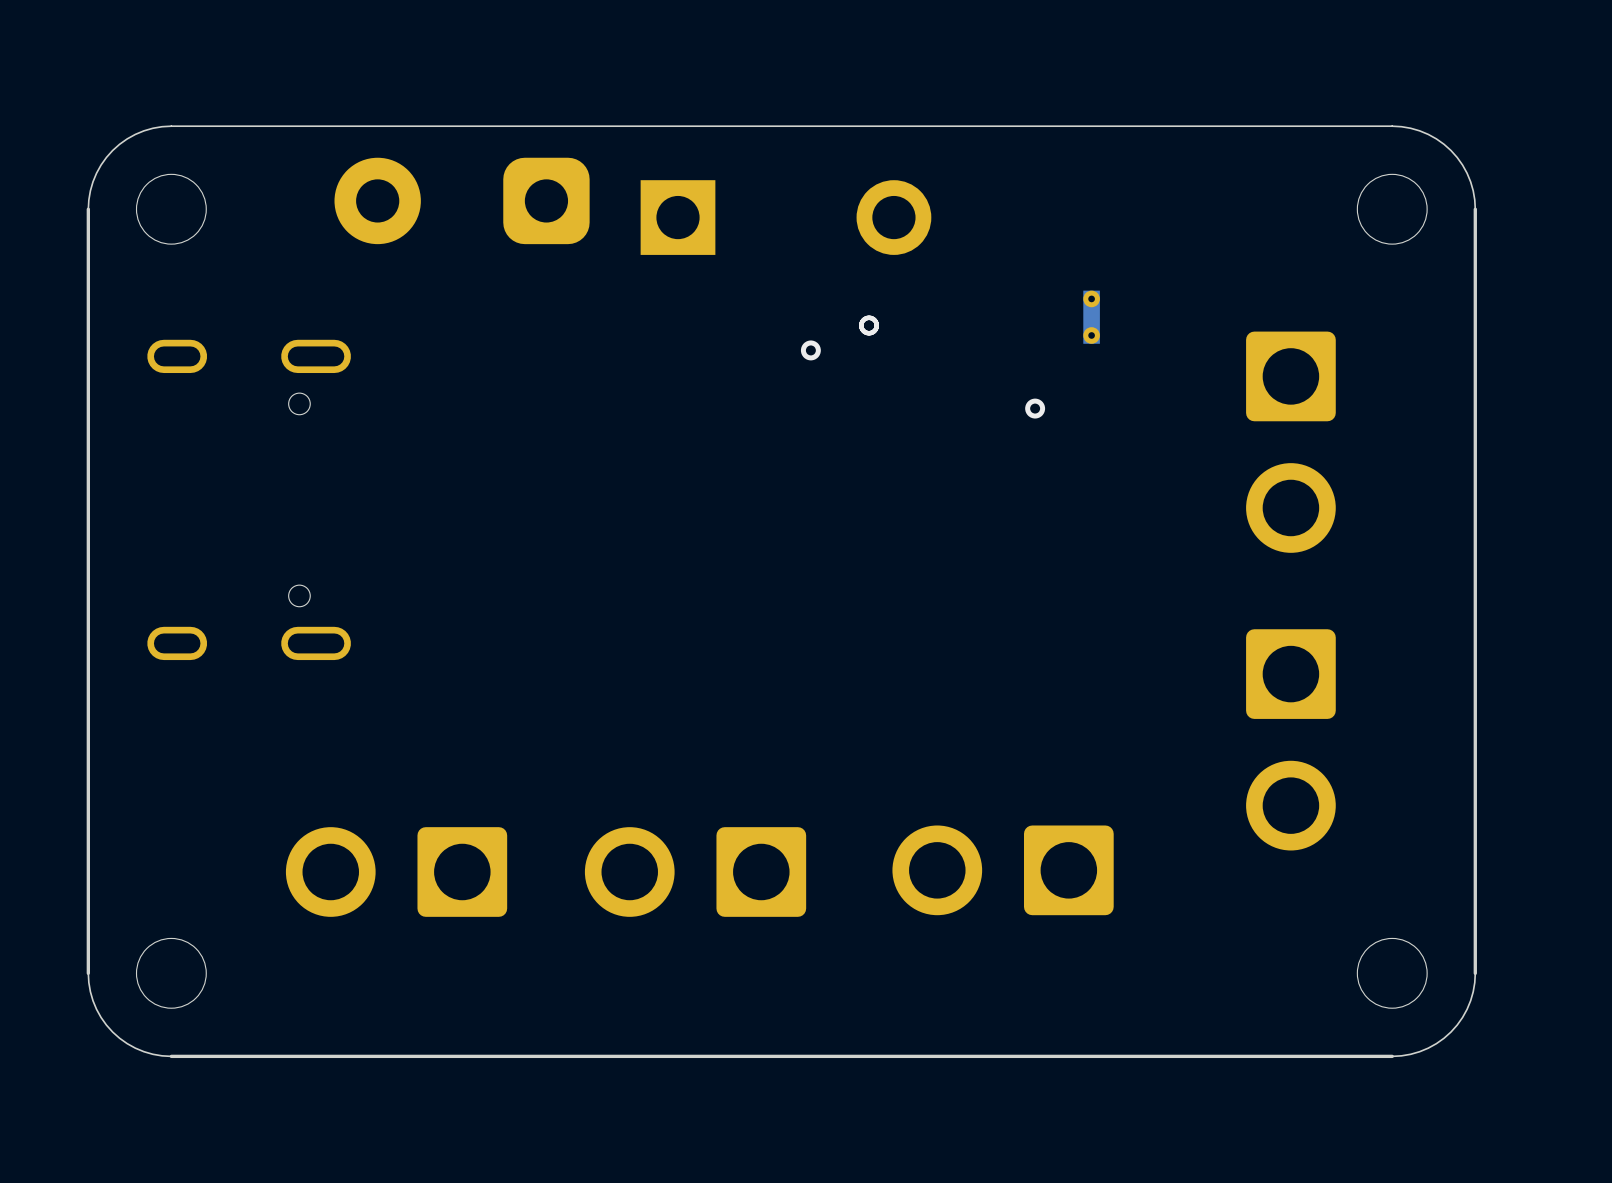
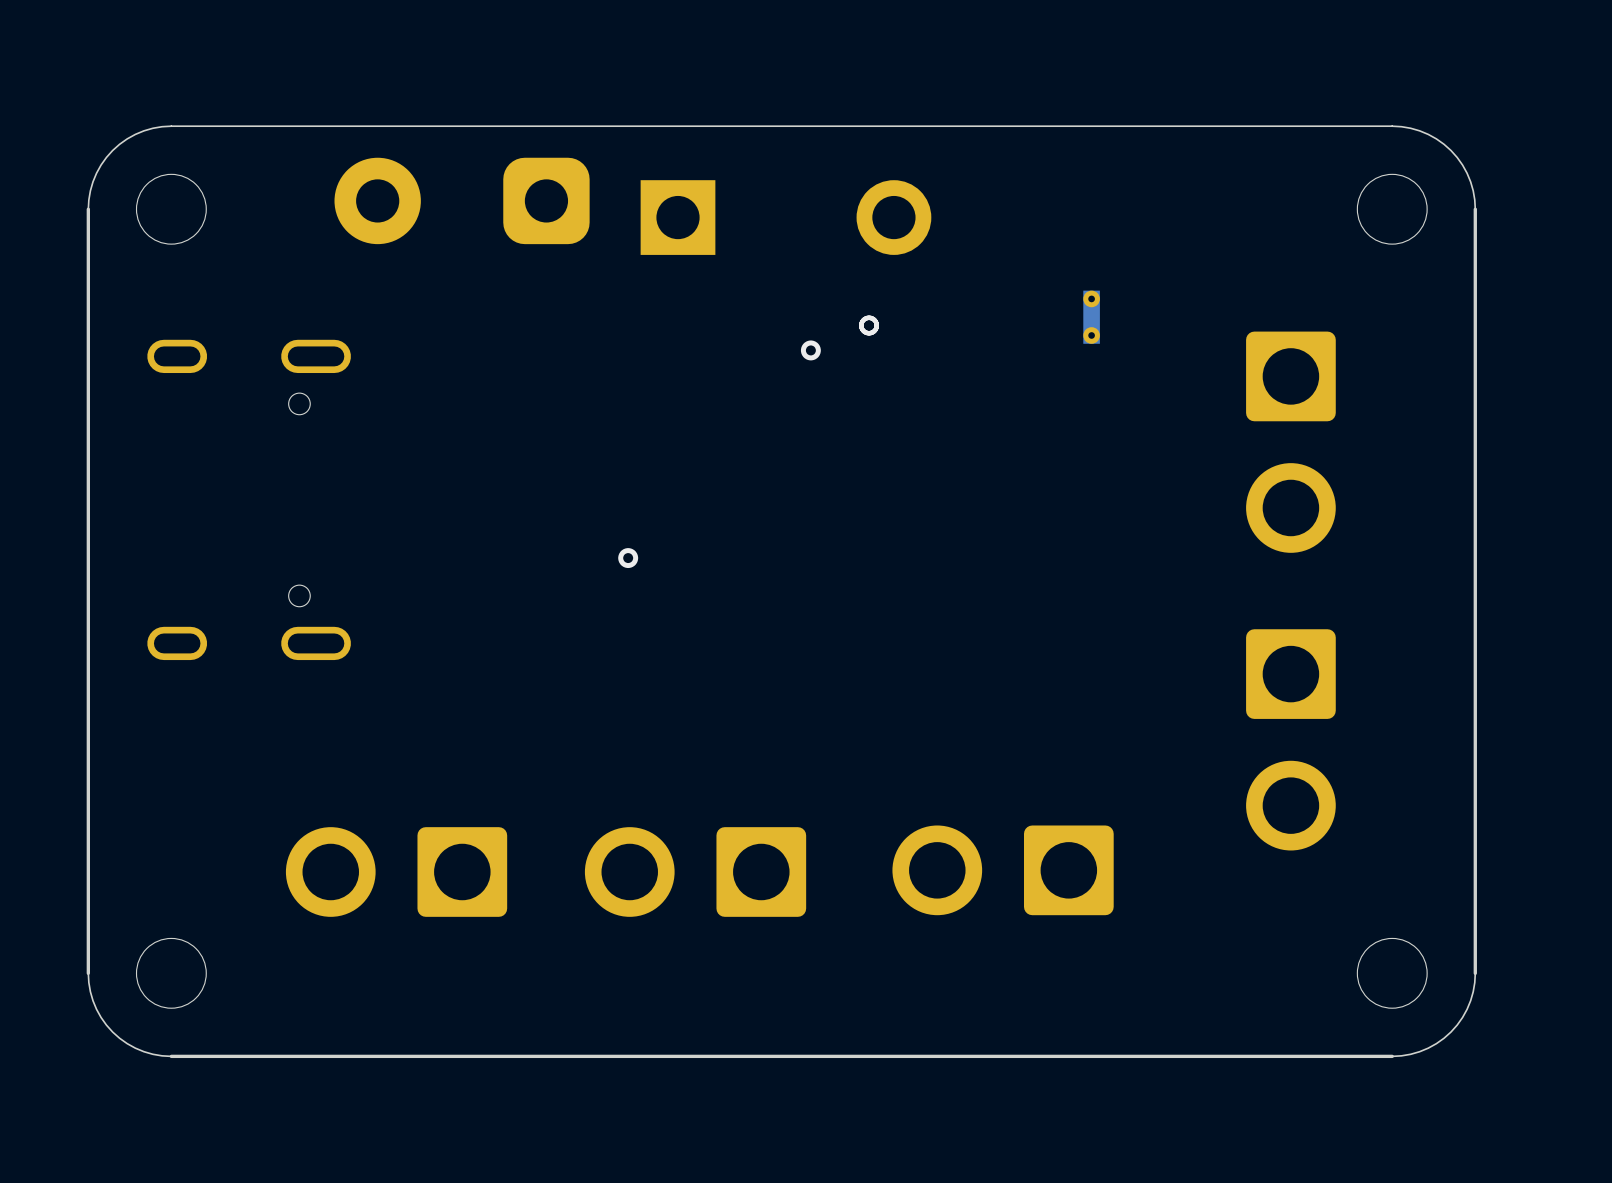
via: (1035, 408) -> none
via: none -> (628, 558)

